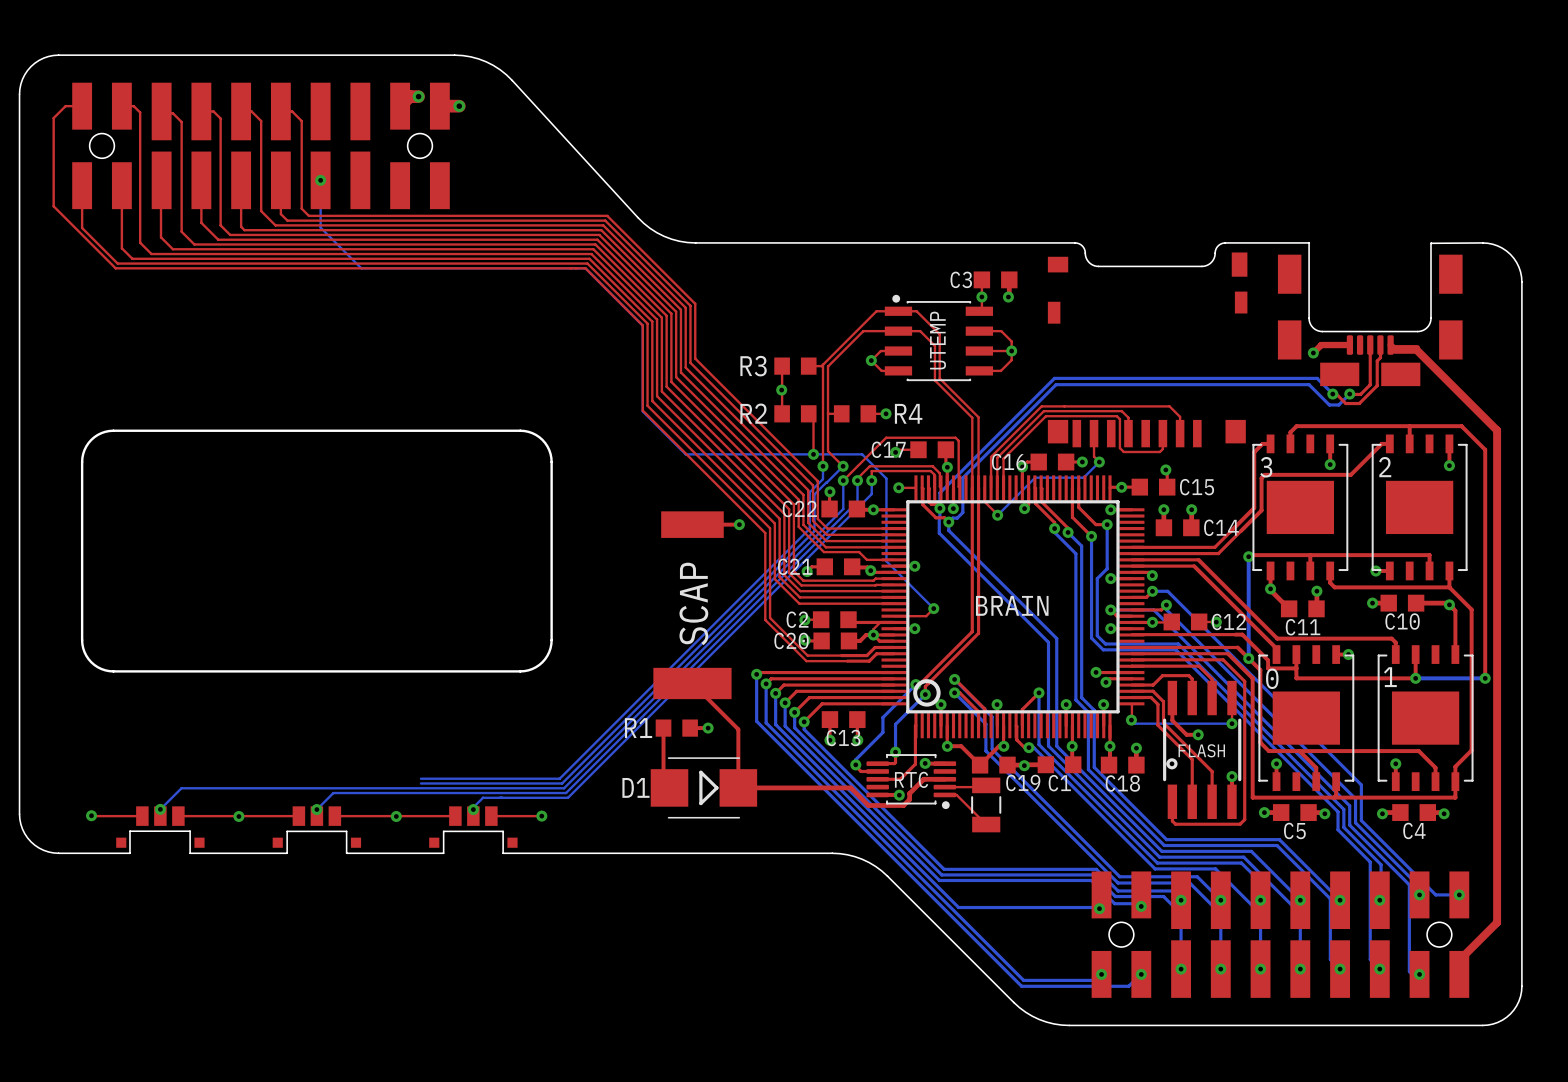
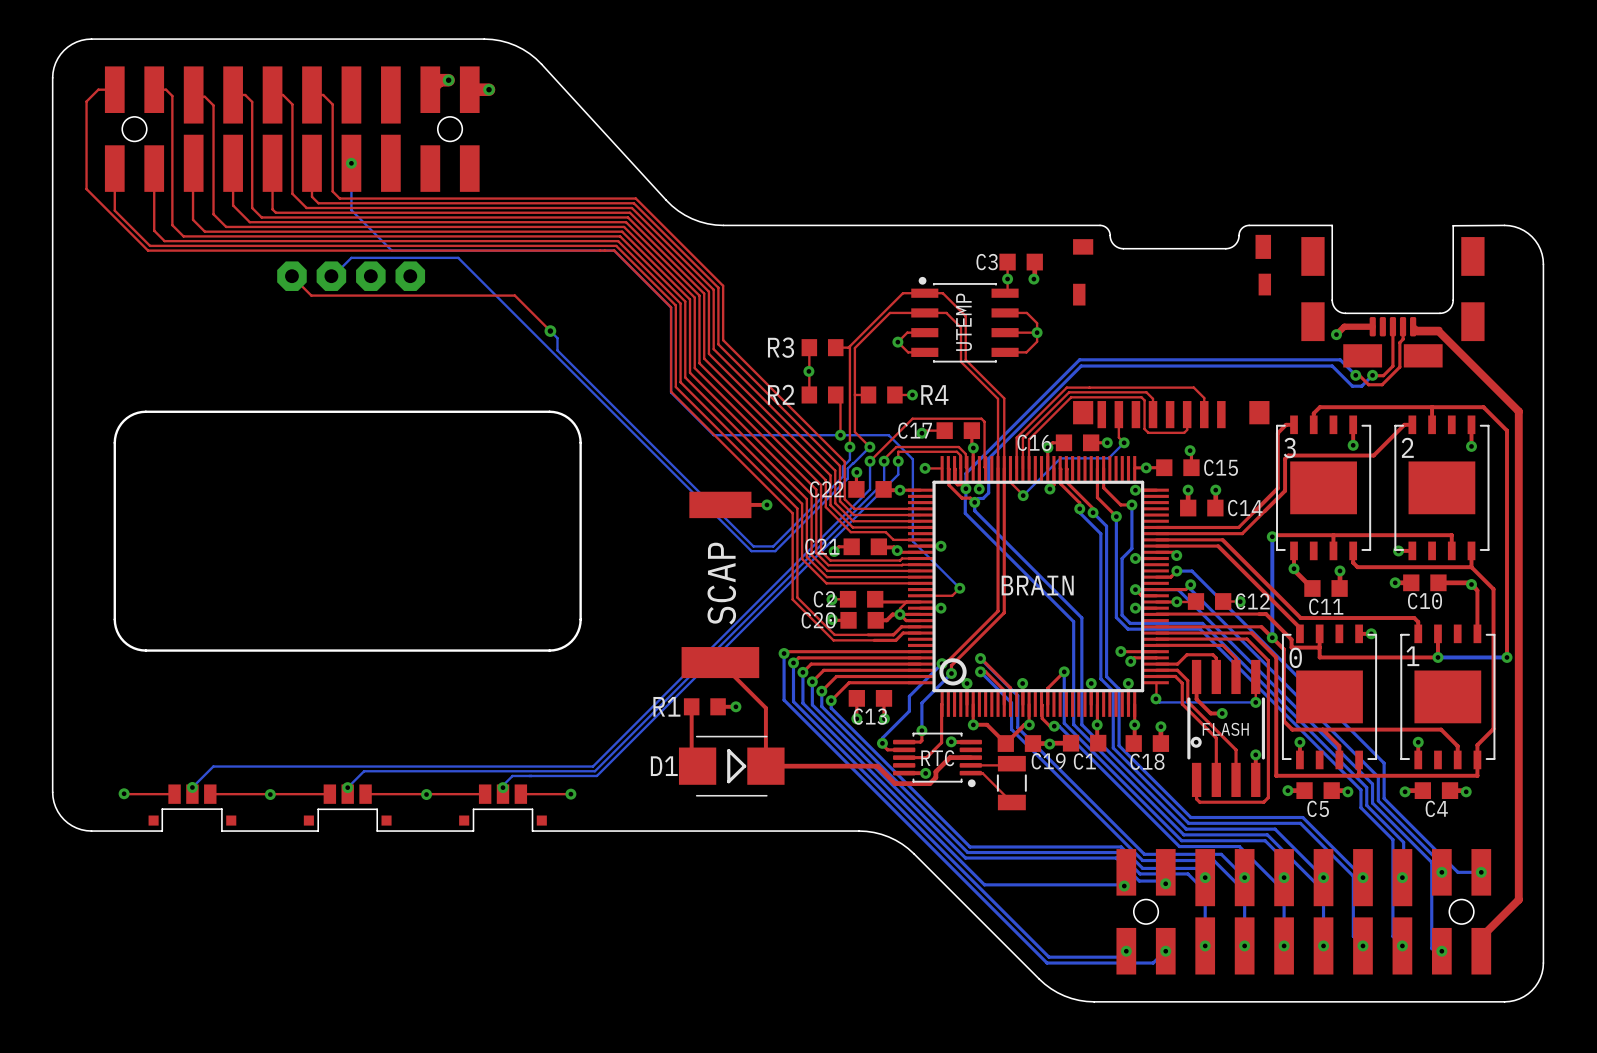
top track: none -> (291, 276) (311, 295) (514, 295) (550, 331)
part: none -> (351, 276)
via: none -> (550, 331)
bottom track: (816, 486) (809, 492) (809, 528) (559, 778) (420, 778) -> (843, 466) (843, 476) (773, 546) (753, 546) (557, 350) (557, 338) (550, 331)
bottom track: (820, 488) (814, 494) (814, 531) (562, 783) (420, 783) -> (847, 468) (847, 478) (775, 551) (751, 551) (458, 257) (351, 257) (331, 276)

